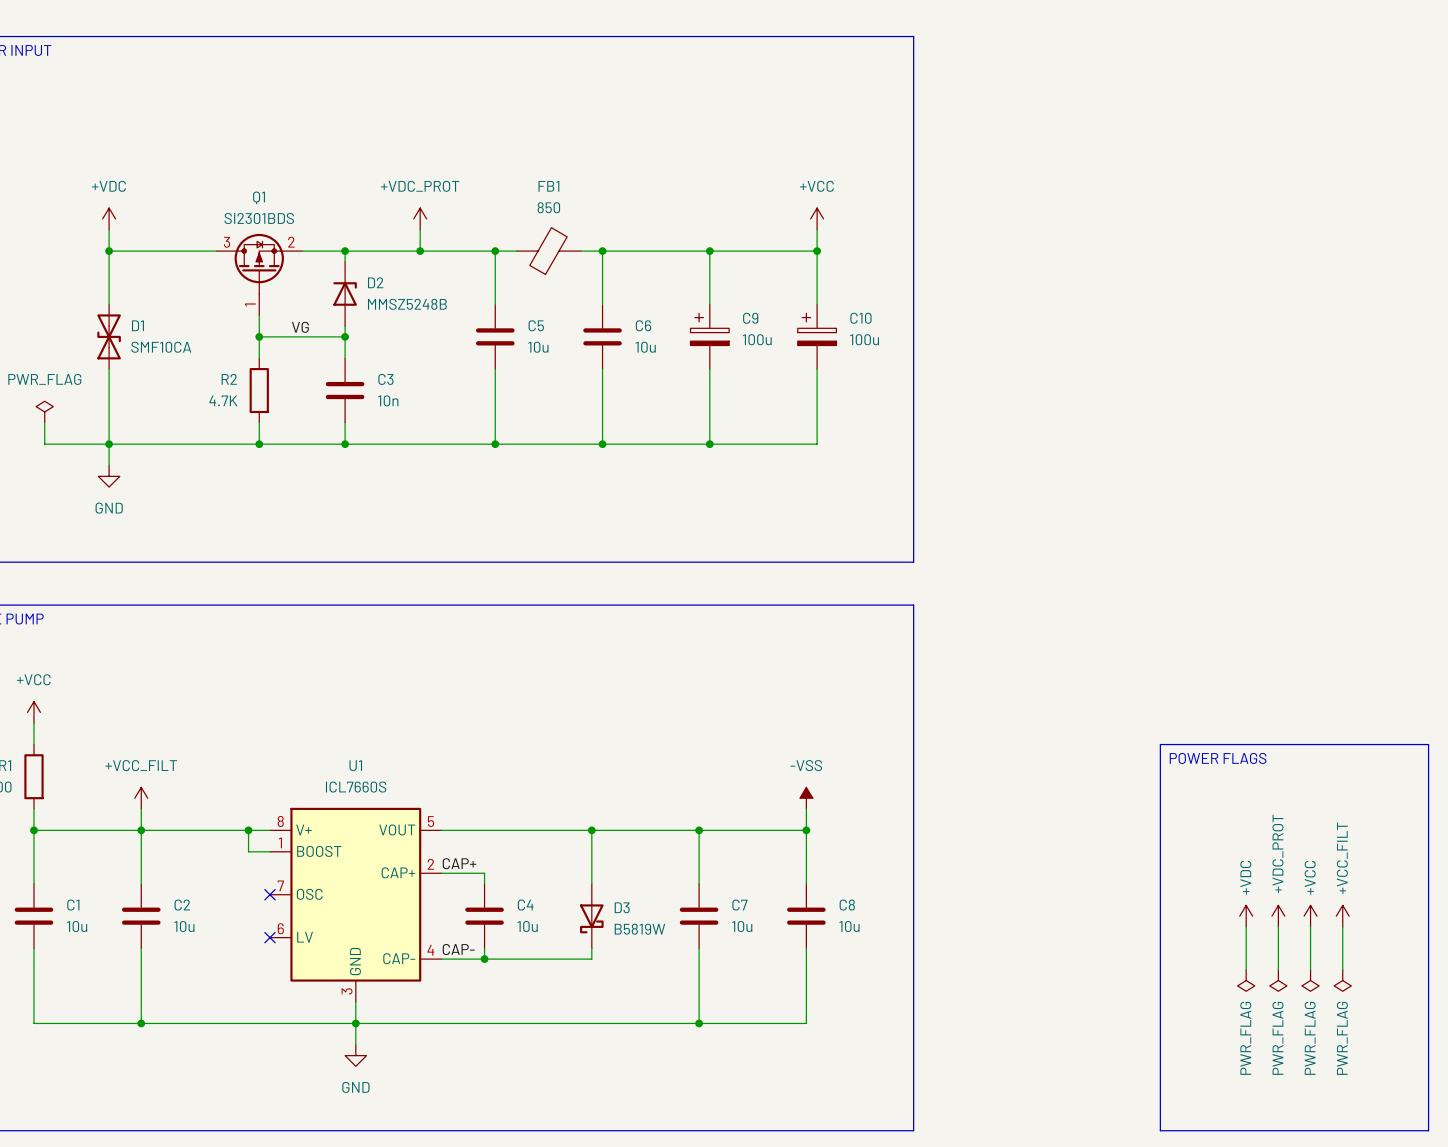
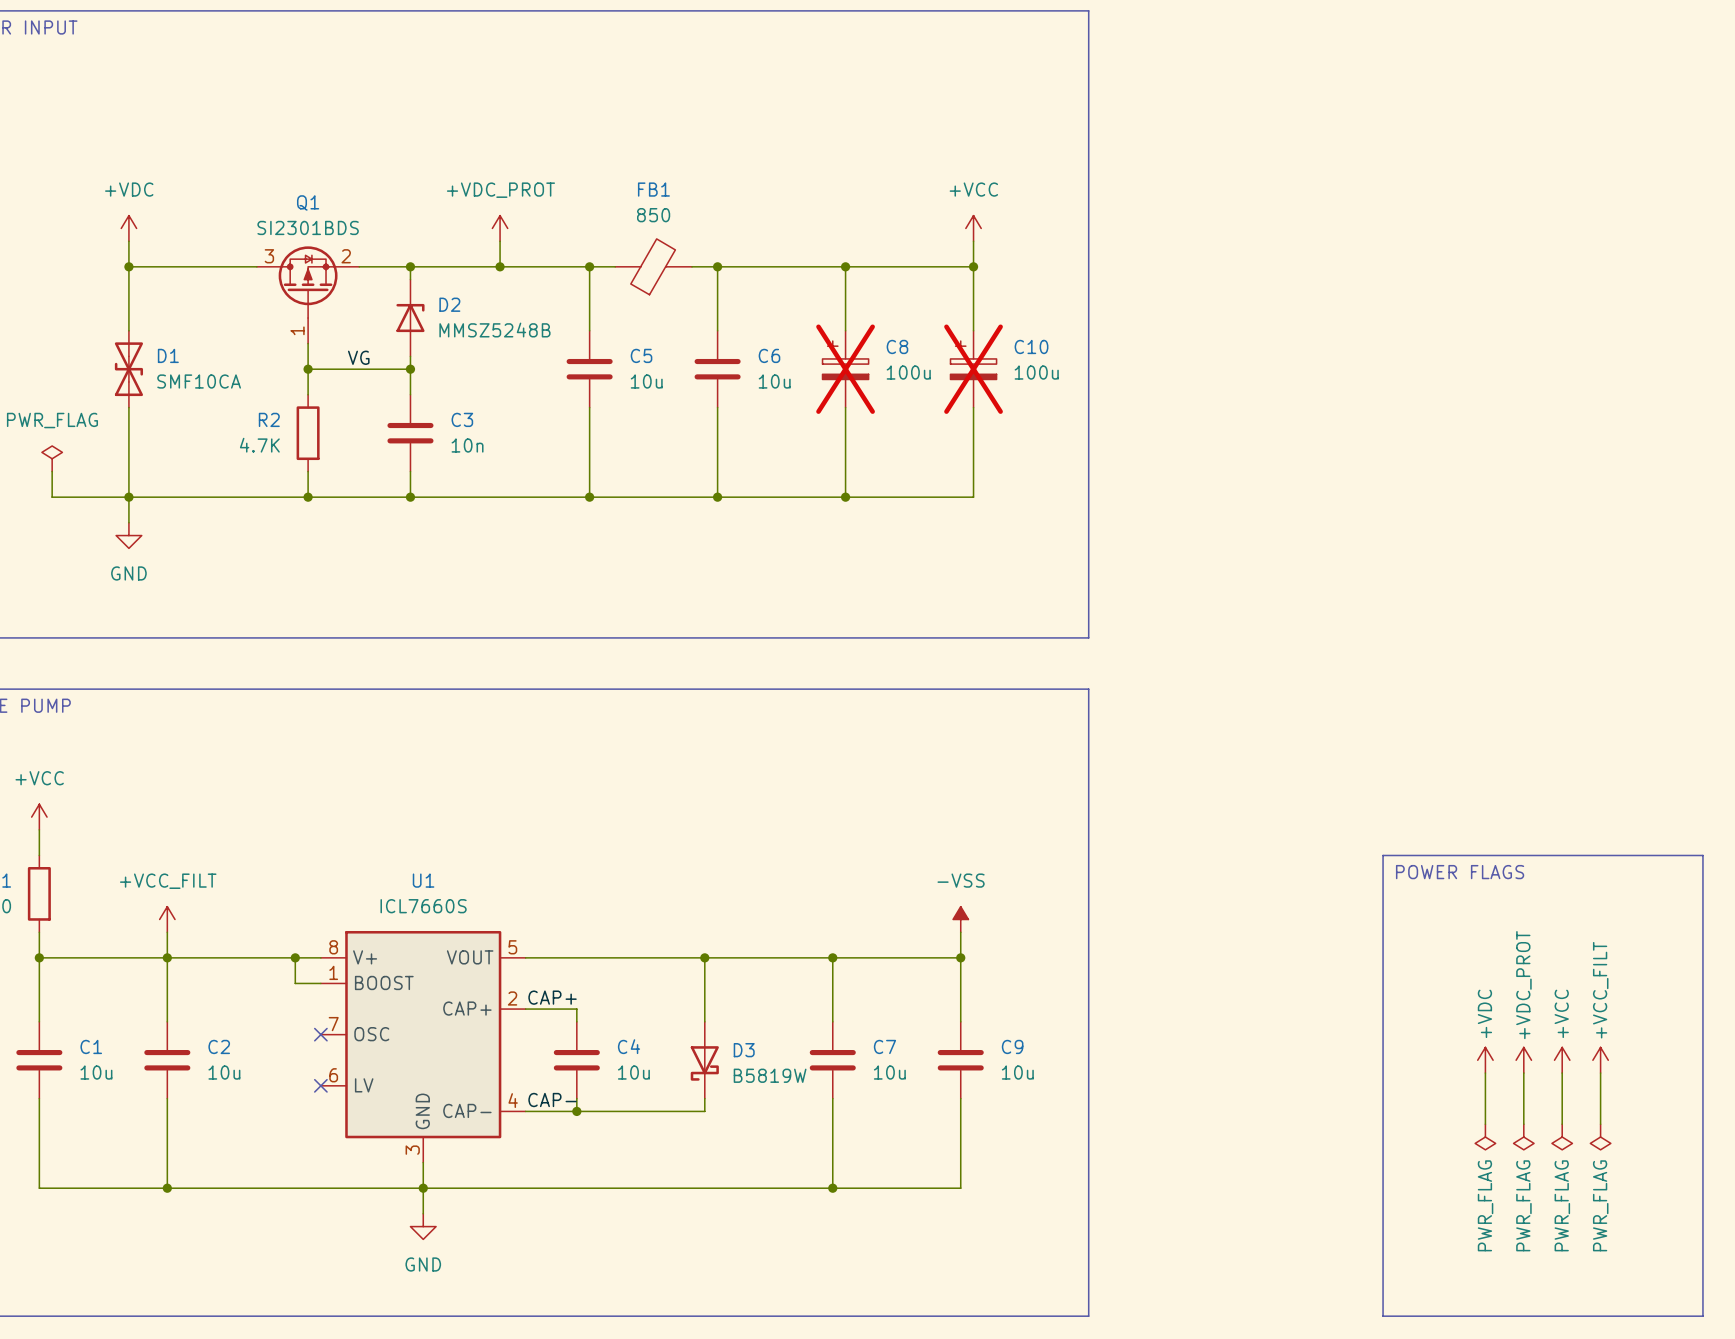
C9 name: C9 (750, 318) -> C8 (897, 346)
C9 do-not-place cross: none -> (845, 369)
C10 do-not-place cross: none -> (973, 369)
C8 name: C8 (847, 905) -> C9 (1012, 1046)

